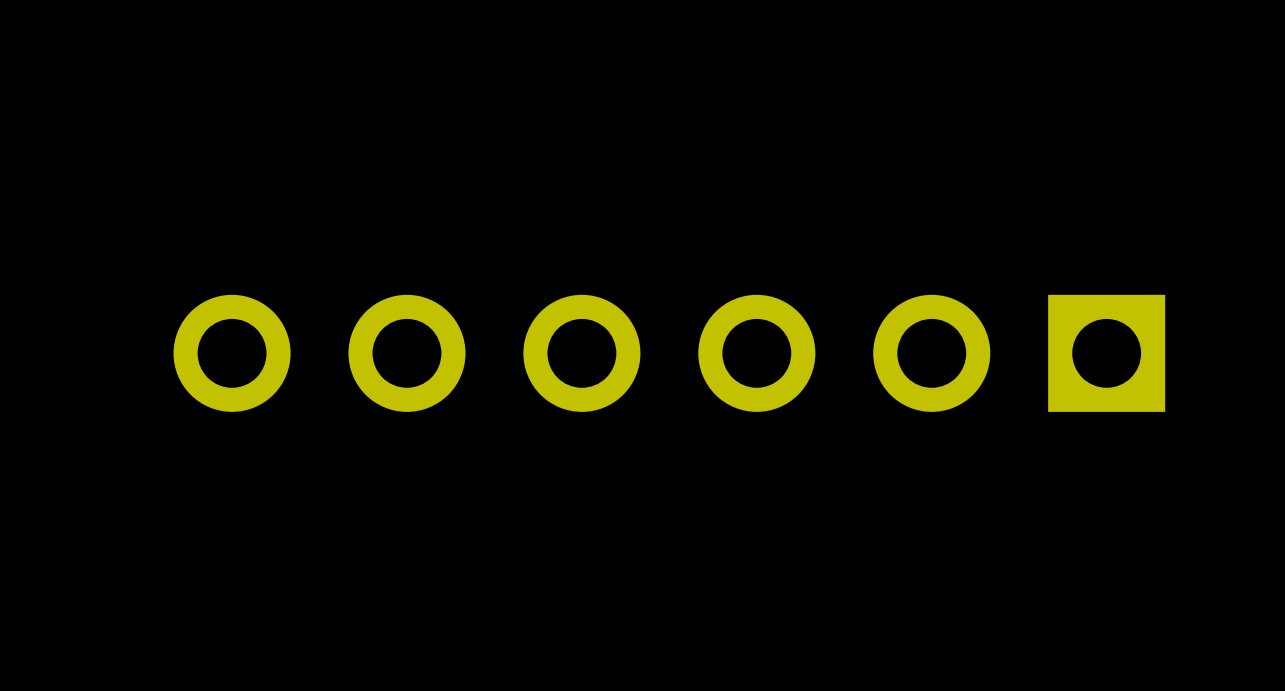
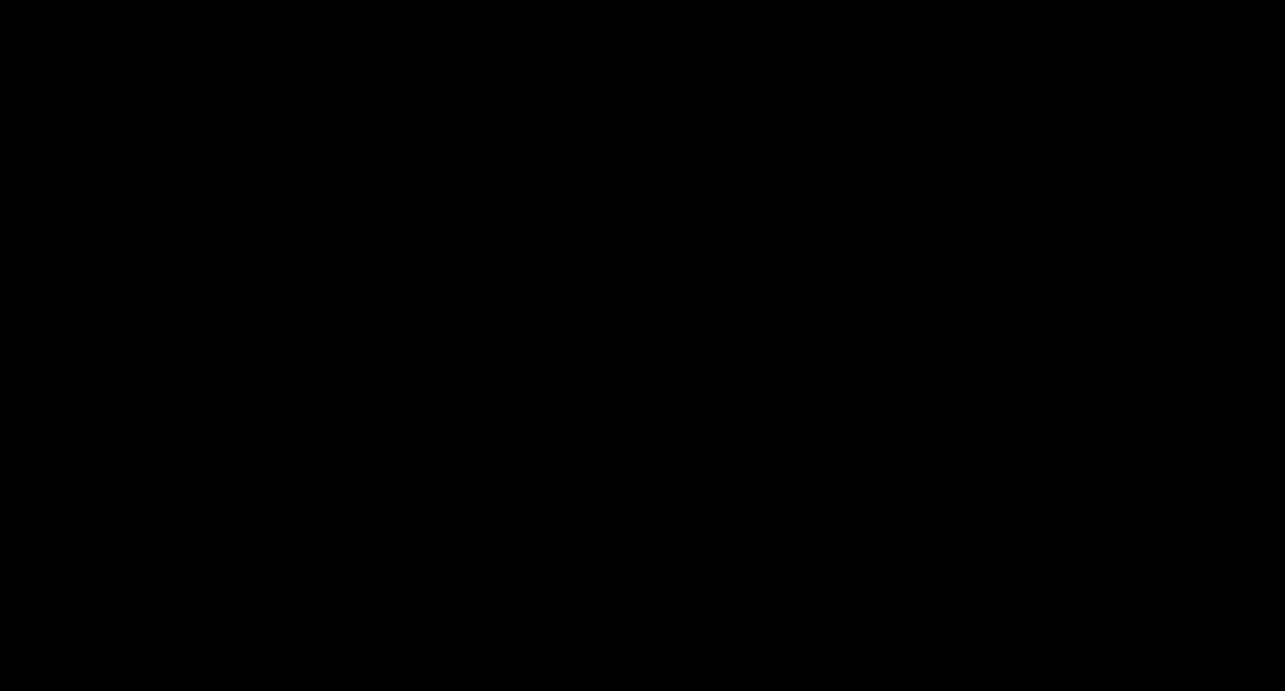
part: (669, 353) -> none

